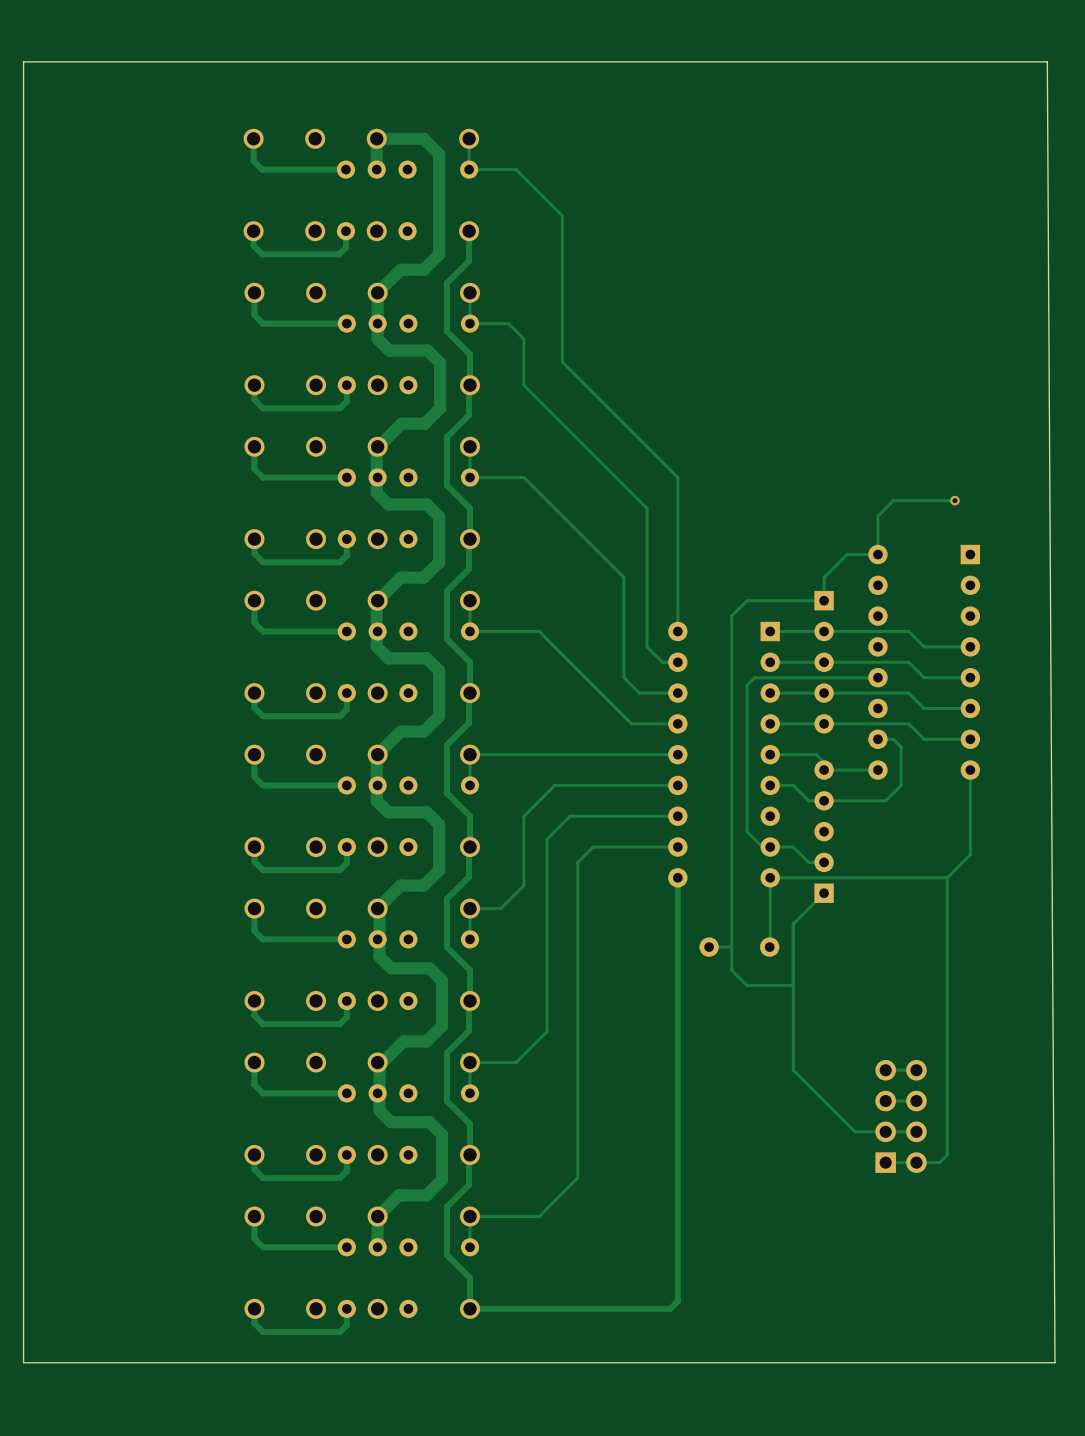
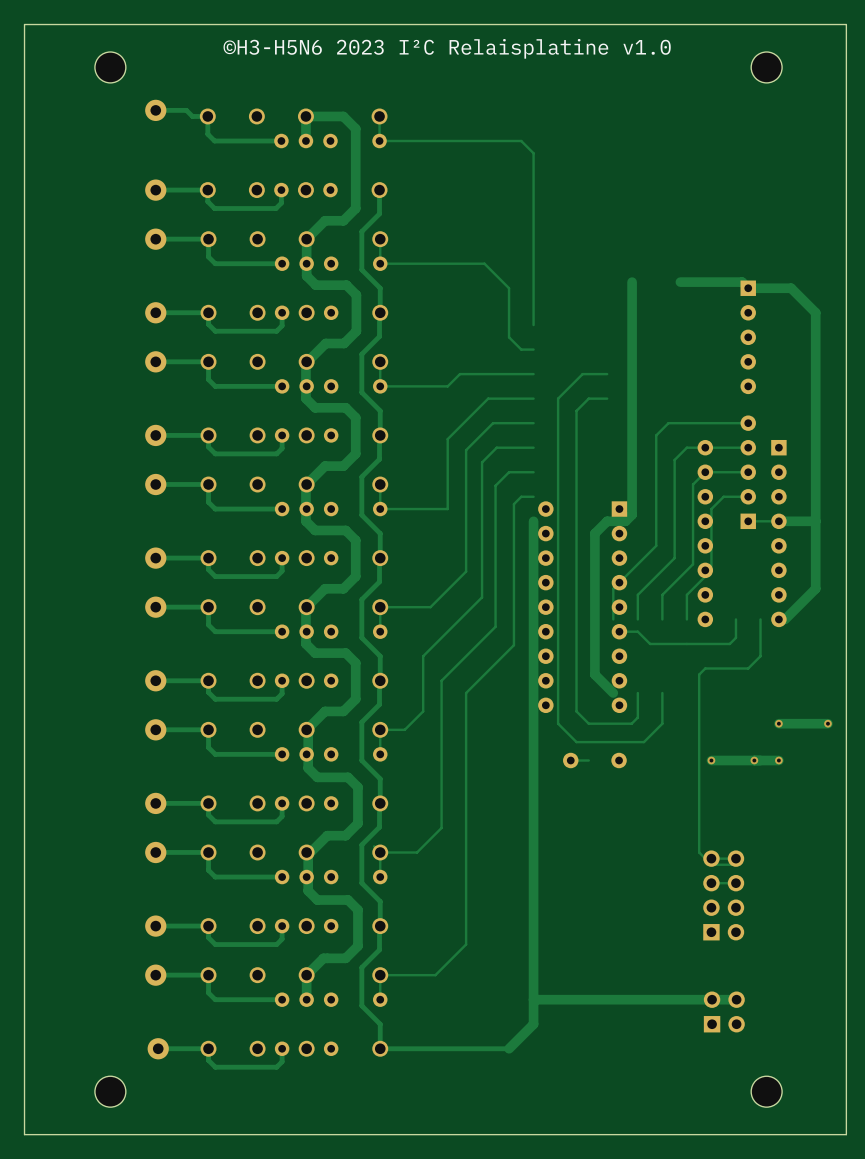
text: none -> ©H3-H5N6 2023 I²C Relaisplatine v1.0 (447, 48)
board edge: (23, 61) (1047, 61) (1055, 1362) (23, 1362) -> (24, 55) (24, 24) (846, 24) (846, 1134) (24, 1134) (24, 1091)
part: none -> (110, 67)
part: none -> (766, 67)
part: none -> (155, 110)
track: none -> (157, 110) (186, 110) (192, 116) (207, 116)
track: (516, 169) (562, 215) (562, 362) (677, 477) (677, 631) -> (417, 141) (521, 141) (533, 153) (533, 325)
part: none -> (155, 190)
track: none -> (207, 190) (155, 190)
part: none -> (155, 239)
track: none -> (207, 239) (155, 239)
track: (508, 323) (523, 339) (523, 385) (647, 508) (647, 646) (662, 662) (677, 662) -> (410, 263) (484, 263) (509, 288) (509, 337) (521, 349) (533, 349)
track: none -> (632, 282) (632, 514) (625, 521) (607, 521) (594, 533) (594, 674) (613, 693)
track: none -> (680, 282) (742, 282) (748, 288) (791, 288) (815, 312) (815, 588) (785, 619)
part: none -> (155, 312)
track: none -> (206, 312) (155, 312)
part: none -> (748, 337)
part: none -> (155, 361)
track: none -> (207, 361) (155, 361)
track: (523, 477) (623, 577) (623, 677) (639, 693) (677, 693) -> (423, 386) (447, 386) (459, 374) (533, 374)
track: none -> (607, 398) (588, 398) (576, 410) (576, 711) (588, 723) (631, 723) (637, 717) (637, 693)
track: (954, 500) (893, 500) (877, 516) (877, 554) -> (748, 447) (705, 447)
via: (954, 500) -> none
track: none -> (748, 423) (668, 423) (656, 435) (656, 545) (613, 588) (613, 619)
part: none -> (155, 435)
track: none -> (207, 435) (160, 435) (155, 440)
track: (854, 554) (847, 554) (824, 577) (824, 600) (747, 600) (731, 616) (731, 970) (747, 985) (793, 985) -> (686, 447) (674, 459) (674, 558) (637, 594) (637, 619)
track: none -> (748, 472) (705, 472) (693, 484) (693, 564) (662, 594) (662, 619)
part: none -> (155, 484)
track: none -> (207, 484) (155, 484)
track: none -> (748, 496) (723, 496) (711, 509) (711, 570) (686, 594) (686, 619)
track: (539, 631) (631, 723) (677, 723) -> (435, 509) (447, 509) (447, 439) (488, 398) (533, 398)
track: (770, 631) (908, 631) (924, 646) (931, 646) -> none
track: none -> (815, 521) (778, 521)
track: (770, 662) (908, 662) (924, 677) (970, 677) -> none
part rotation: 0° (824, 662) -> 180° (748, 472)
part position: (824, 662) -> (748, 472)
track: (877, 677) (754, 677) (747, 685) (747, 831) (762, 847) (793, 847) (808, 862) (824, 862) -> (607, 374) (582, 374) (558, 398) (558, 723) (576, 742) (643, 742) (662, 723) (662, 693)
part: none -> (155, 558)
track: none -> (209, 558) (161, 558) (157, 563)
track: (770, 693) (908, 693) (924, 708) (970, 708) -> none
track: (770, 723) (908, 723) (924, 739) (970, 739) -> none
track: (877, 739) (893, 739) (901, 746) (901, 785) (885, 800) -> (735, 619) (735, 637) (729, 643) (711, 643)
part: none -> (155, 607)
track: none -> (205, 607) (158, 607)
track: (673, 754) (533, 754) -> (533, 423) (493, 423) (466, 450) (466, 571) (430, 607)
track: (770, 754) (816, 754) (831, 770) (877, 770) -> none
track: none -> (760, 619) (760, 656) (748, 668) (705, 668) (699, 674) (699, 852) (711, 864) (735, 864)
track: (970, 770) (970, 854) (947, 877) -> none
track: (677, 785) (554, 785) -> (533, 447) (496, 447) (482, 462) (482, 597) (447, 631)
track: (677, 816) (570, 816) (546, 839) (546, 847) -> (533, 472) (509, 472) (495, 485) (495, 626) (441, 680)
part: (824, 831) -> none
part: none -> (155, 680)
track: none -> (208, 680) (155, 680)
track: (677, 847) (593, 847) -> (533, 496) (521, 496) (513, 504) (513, 645) (478, 680)
track: (677, 877) (677, 1301) (670, 1308) (631, 1308) -> (533, 521) (533, 1024) (509, 1048)
track: (947, 877) (947, 1154) (939, 1162) (885, 1162) -> none
track: (947, 877) (770, 877) (769, 947) -> none
track: (824, 893) (793, 924) (793, 1070) (854, 1131) (916, 1131) -> none
via: none -> (778, 723)
track: none -> (827, 723) (778, 723)
via: none -> (827, 723)
part: none -> (155, 729)
track: none -> (207, 729) (155, 729)
via: none -> (711, 760)
via: none -> (754, 760)
track: none -> (778, 760) (711, 760)
via: none -> (778, 760)
part: none -> (155, 803)
track: none -> (208, 803) (155, 803)
part: none -> (155, 852)
track: none -> (207, 852) (155, 852)
part: none -> (155, 926)
track: none -> (209, 926) (155, 926)
part: none -> (155, 975)
track: none -> (207, 975) (155, 975)
track: none -> (736, 999) (533, 999)
part: none -> (724, 1011)
part: none -> (158, 1048)
track: none -> (209, 1048) (158, 1048)
part: none -> (110, 1091)
part: none -> (766, 1091)

